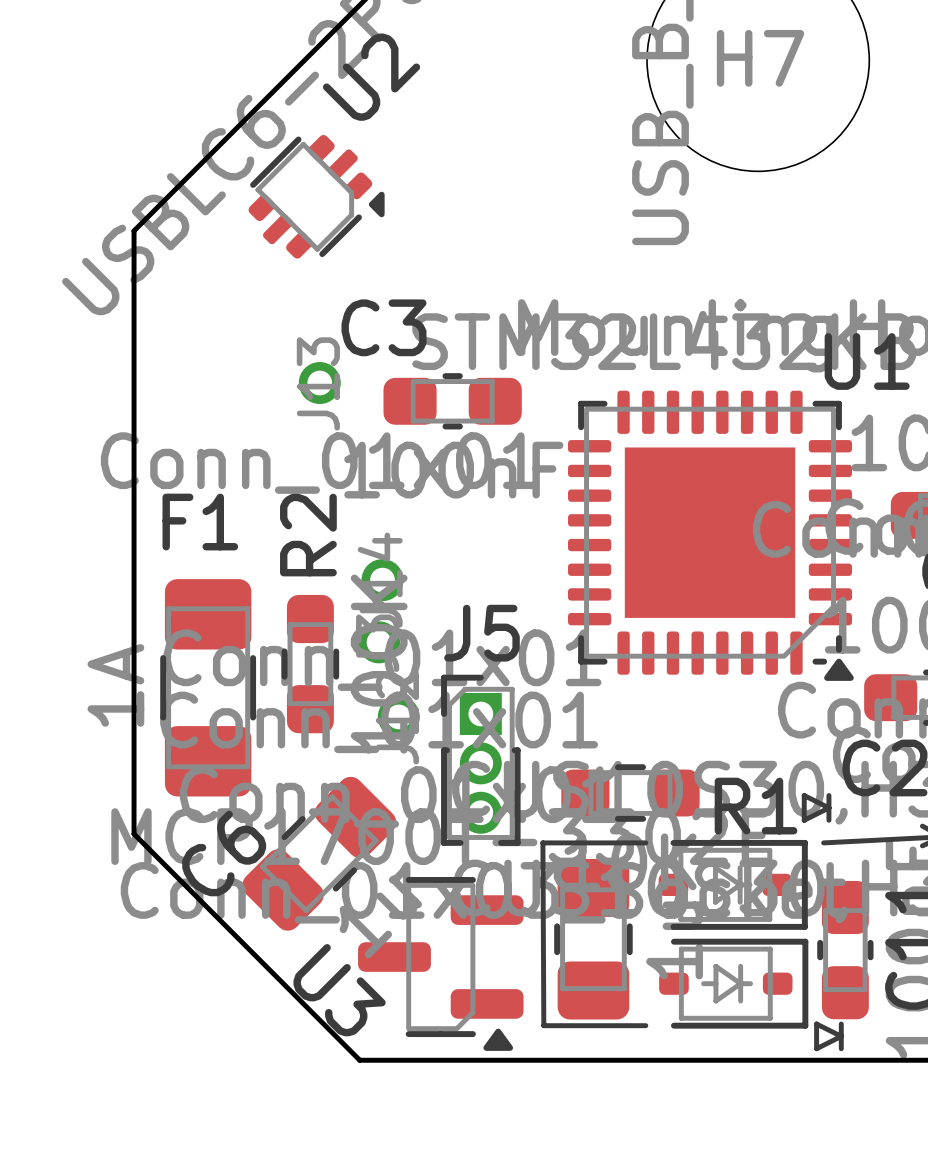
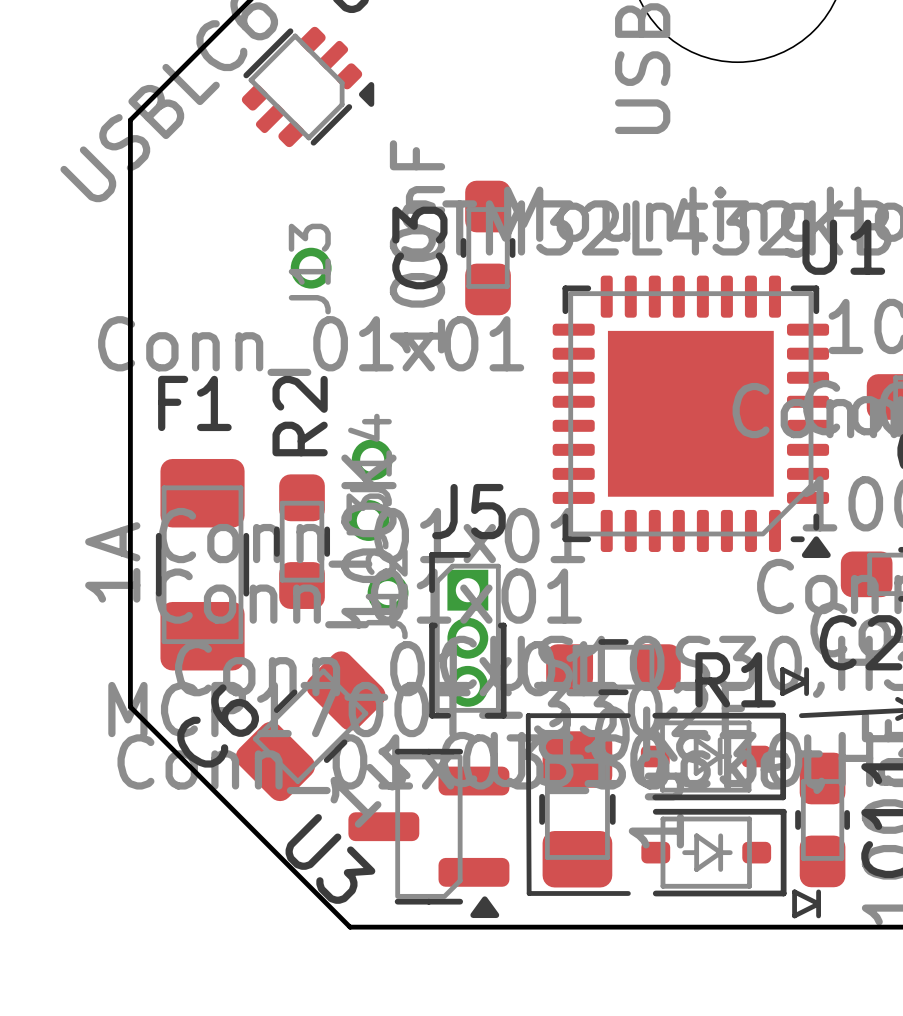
C3 rotation: 0° (452, 401) -> 90° clockwise (488, 247)

